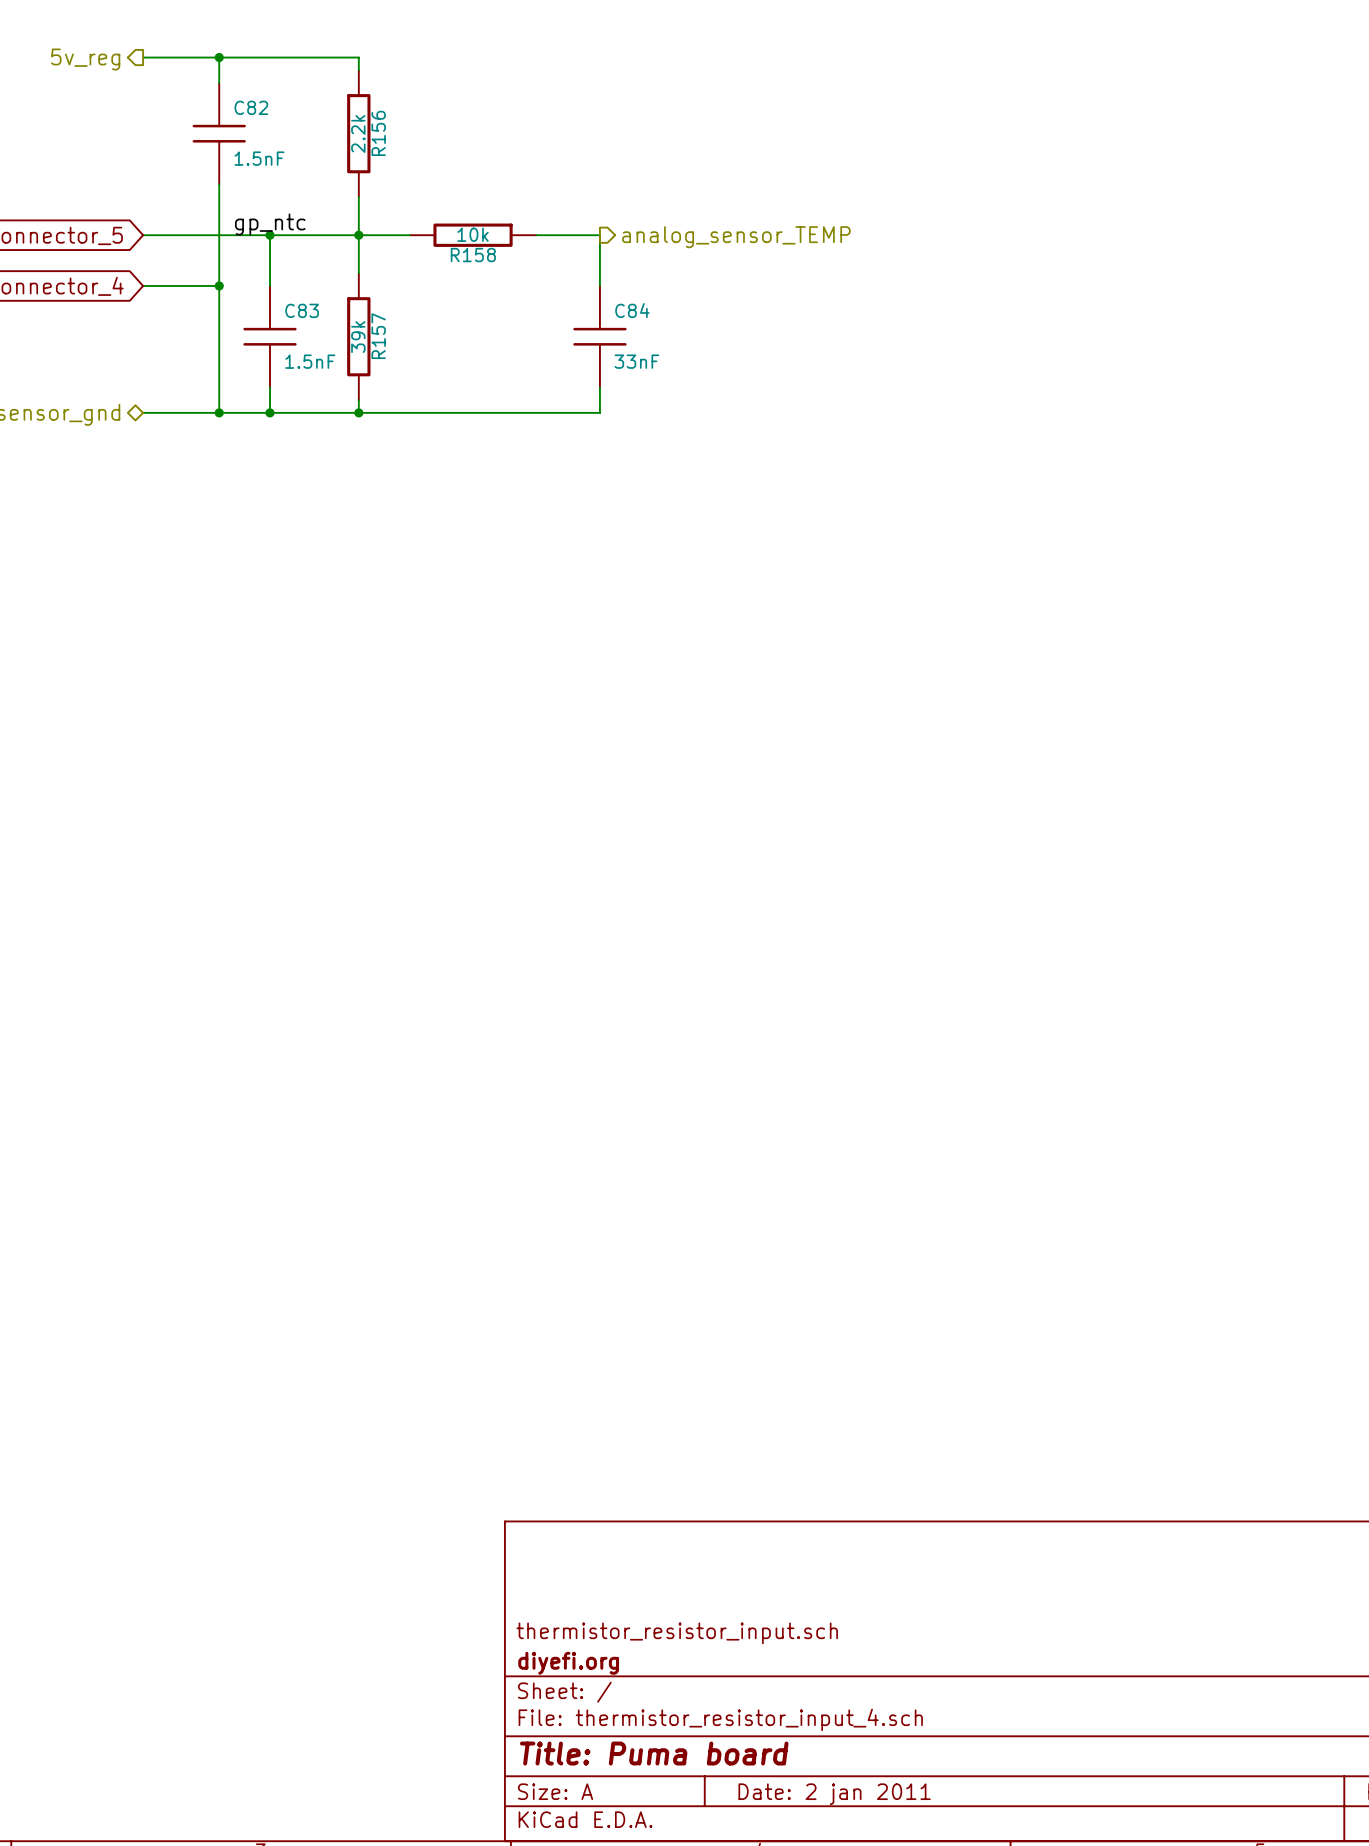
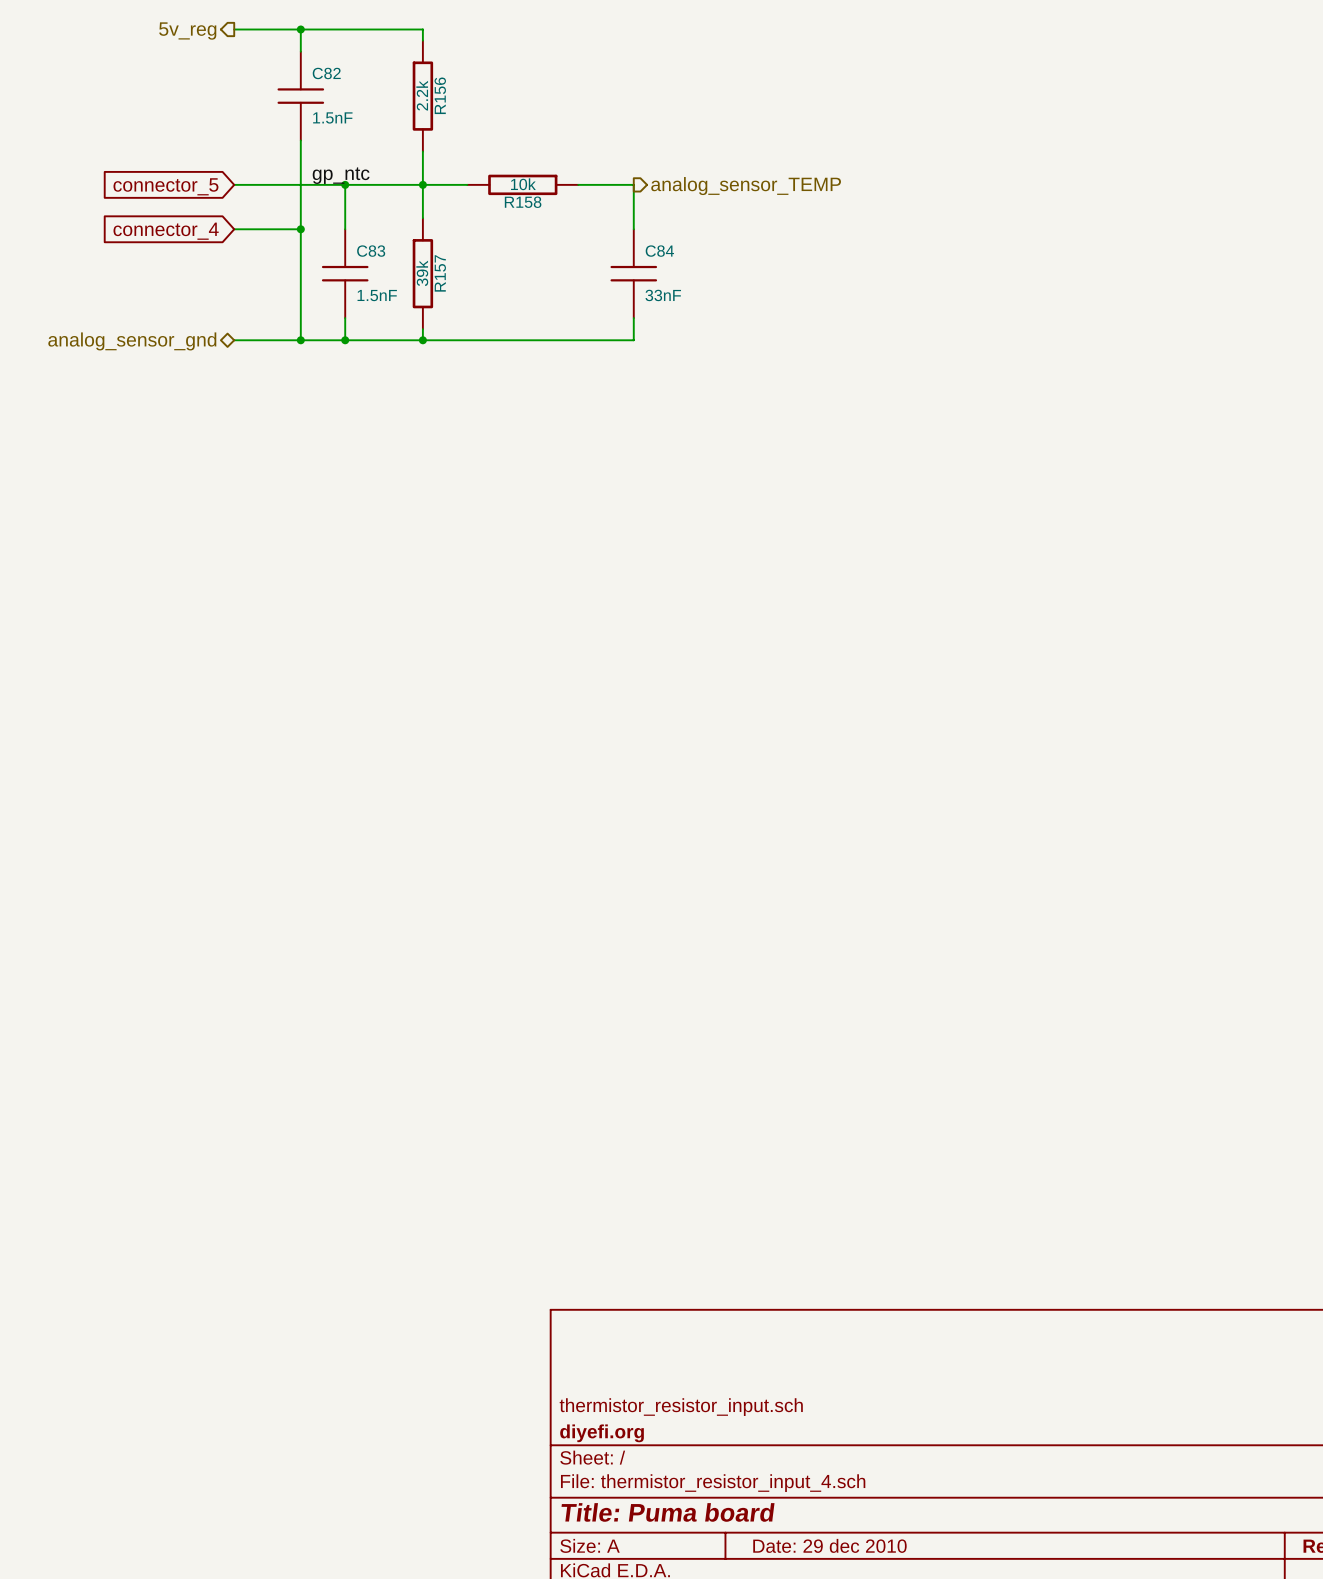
title block: Date: 2 jan 2011 (834, 1794) -> Date: 29 dec 2010 (829, 1545)

